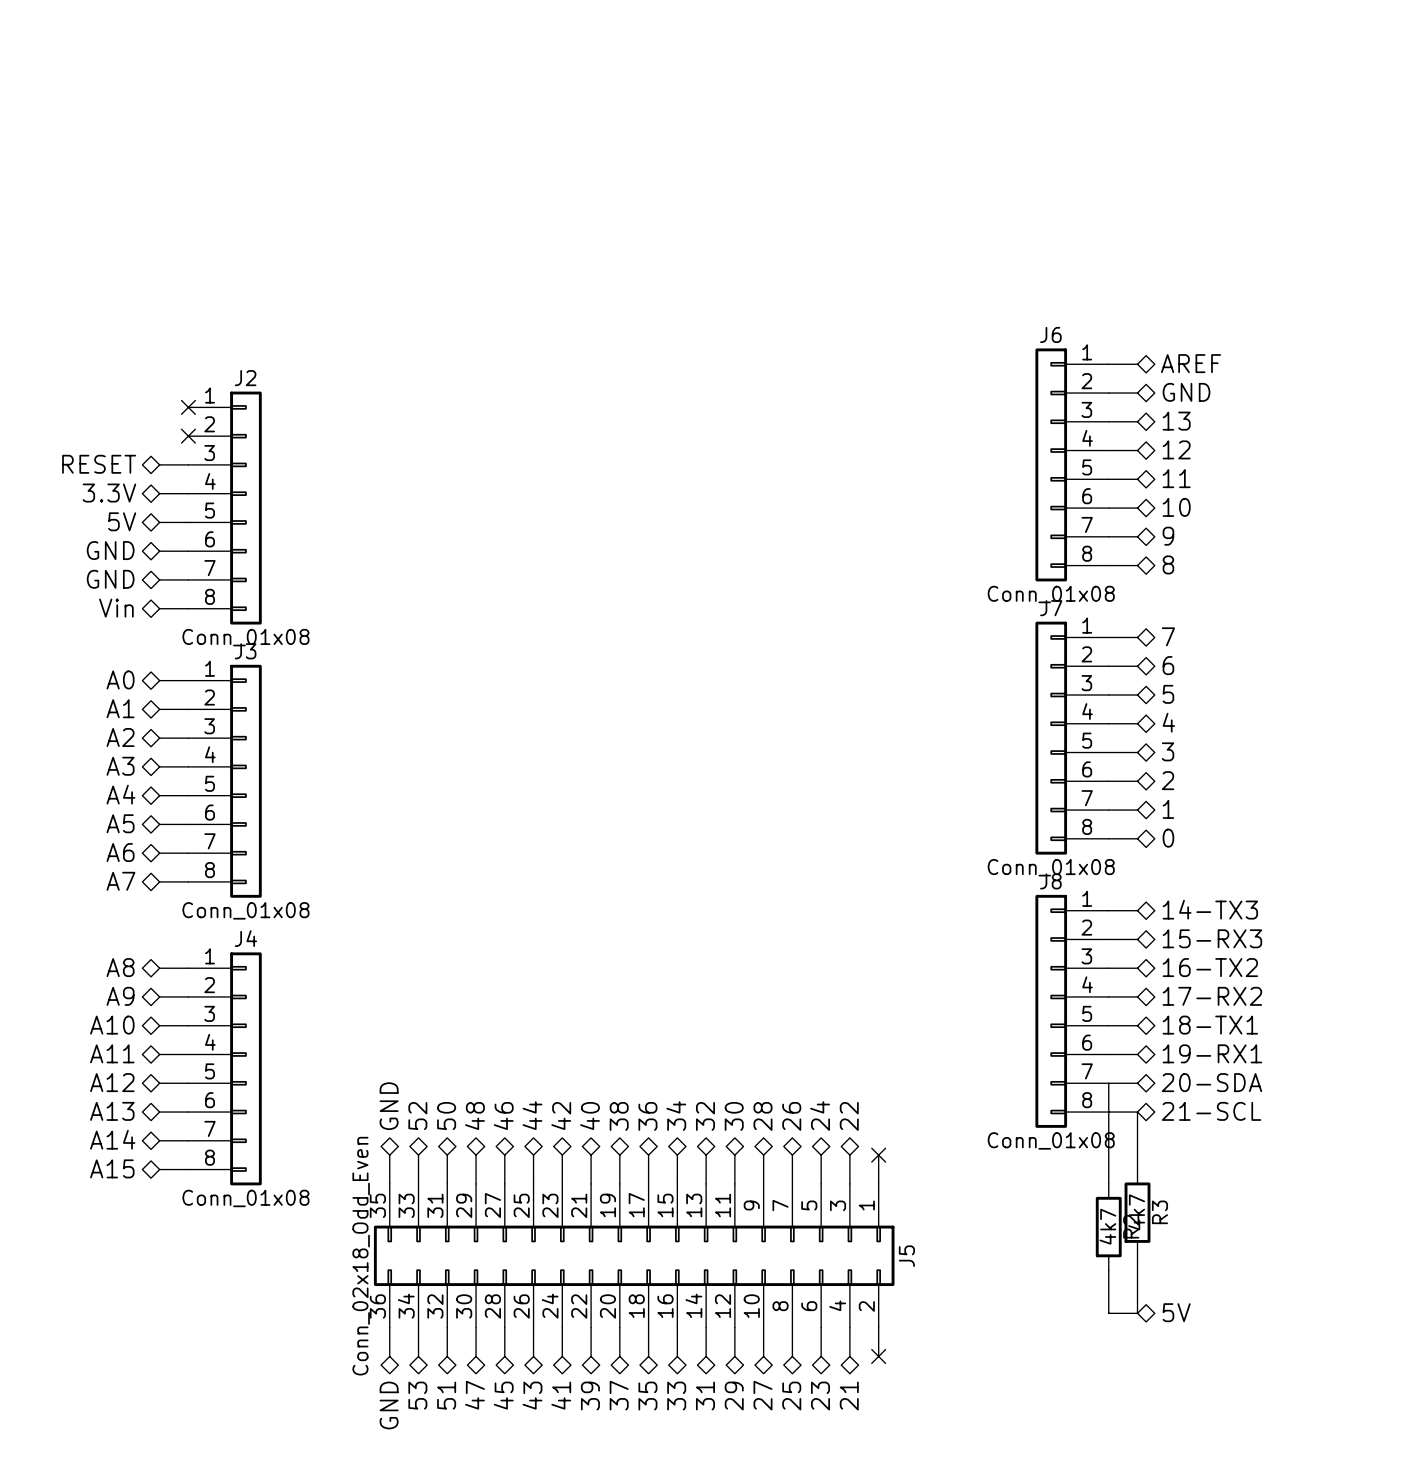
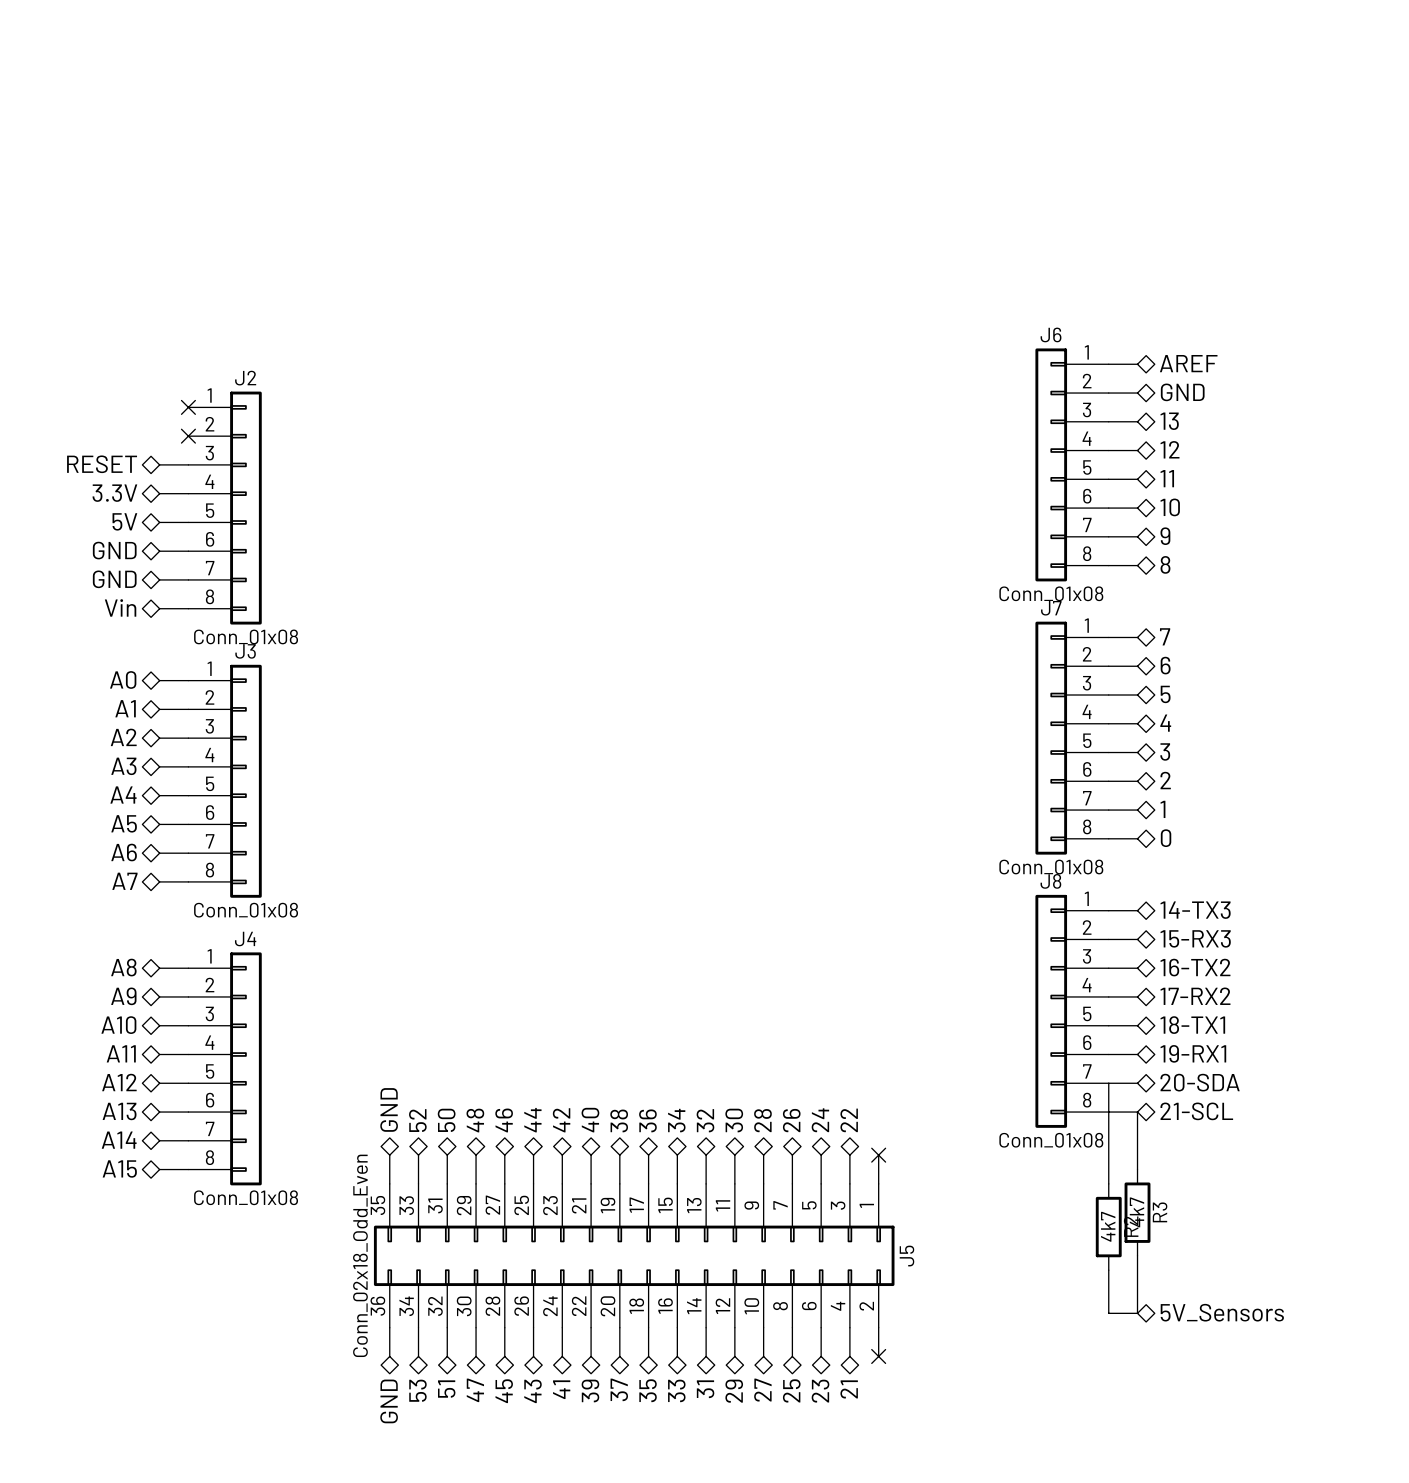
hierarchical label: 5V (1176, 1312) -> 5V_Sensors (1222, 1312)

